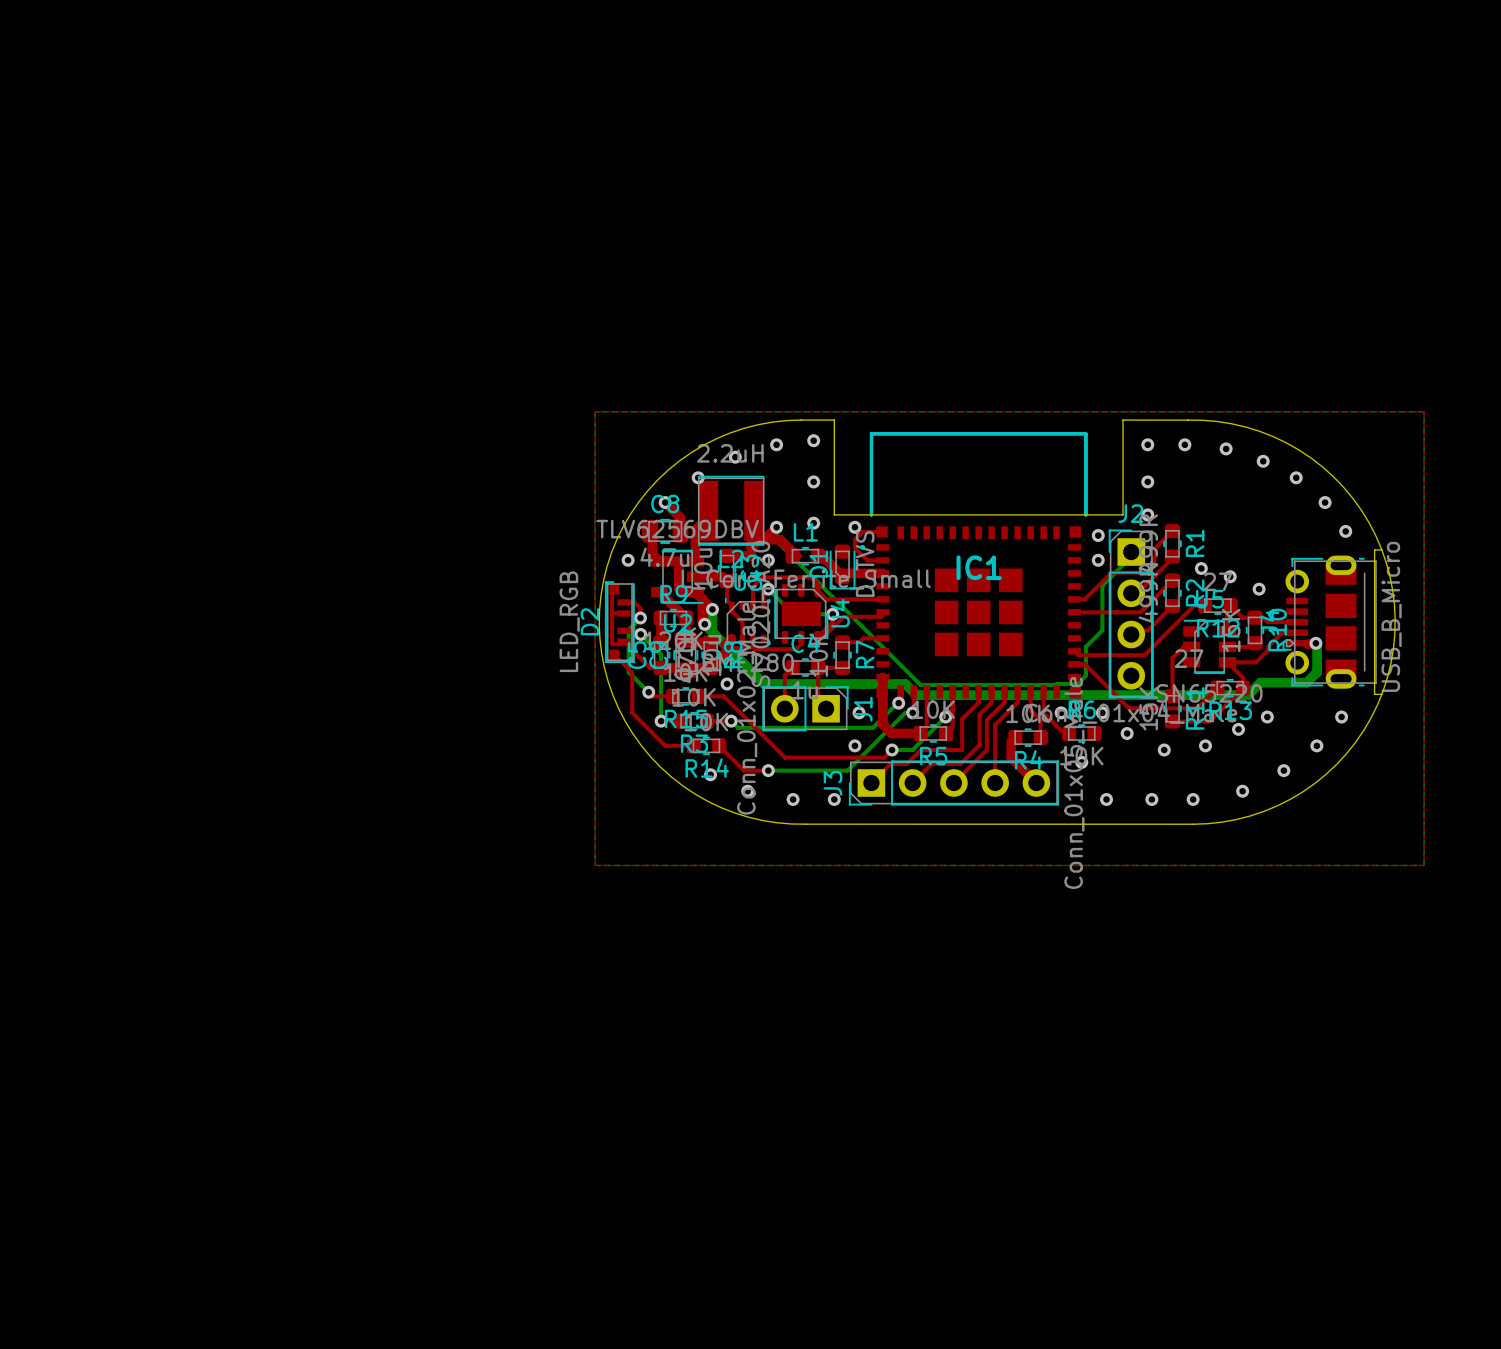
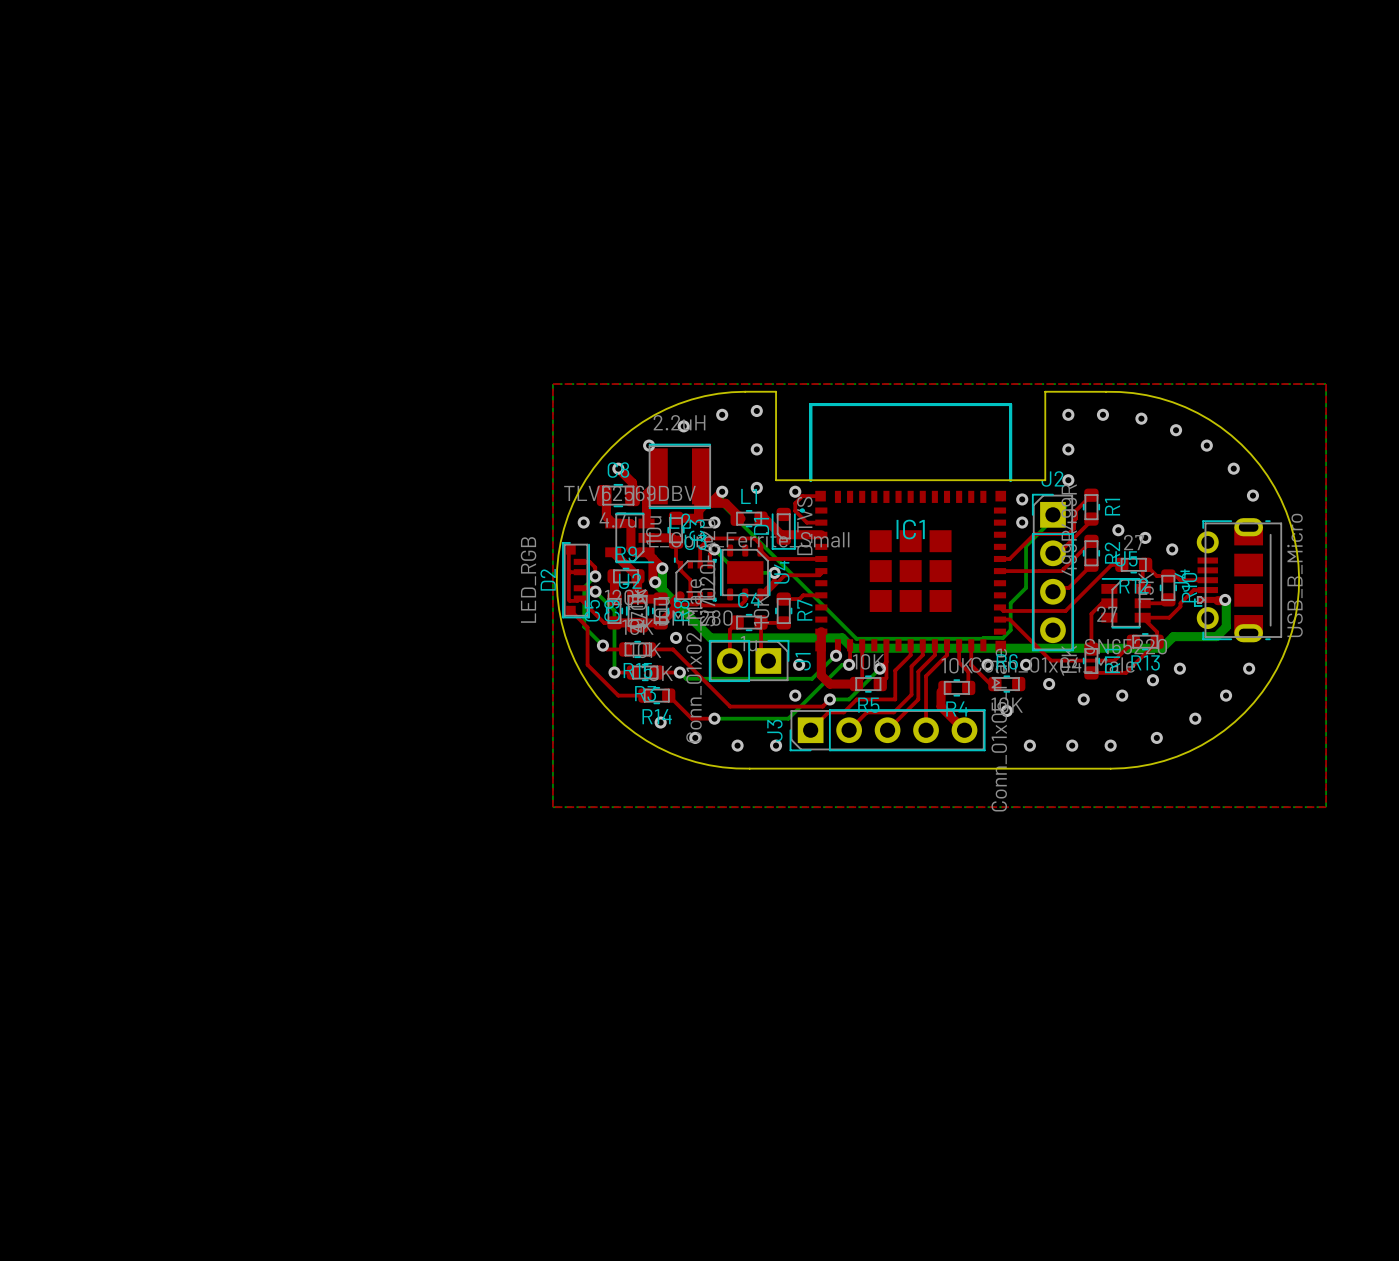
board edge: (1381, 549) (1374, 549) (1374, 694) (1381, 694) -> none

